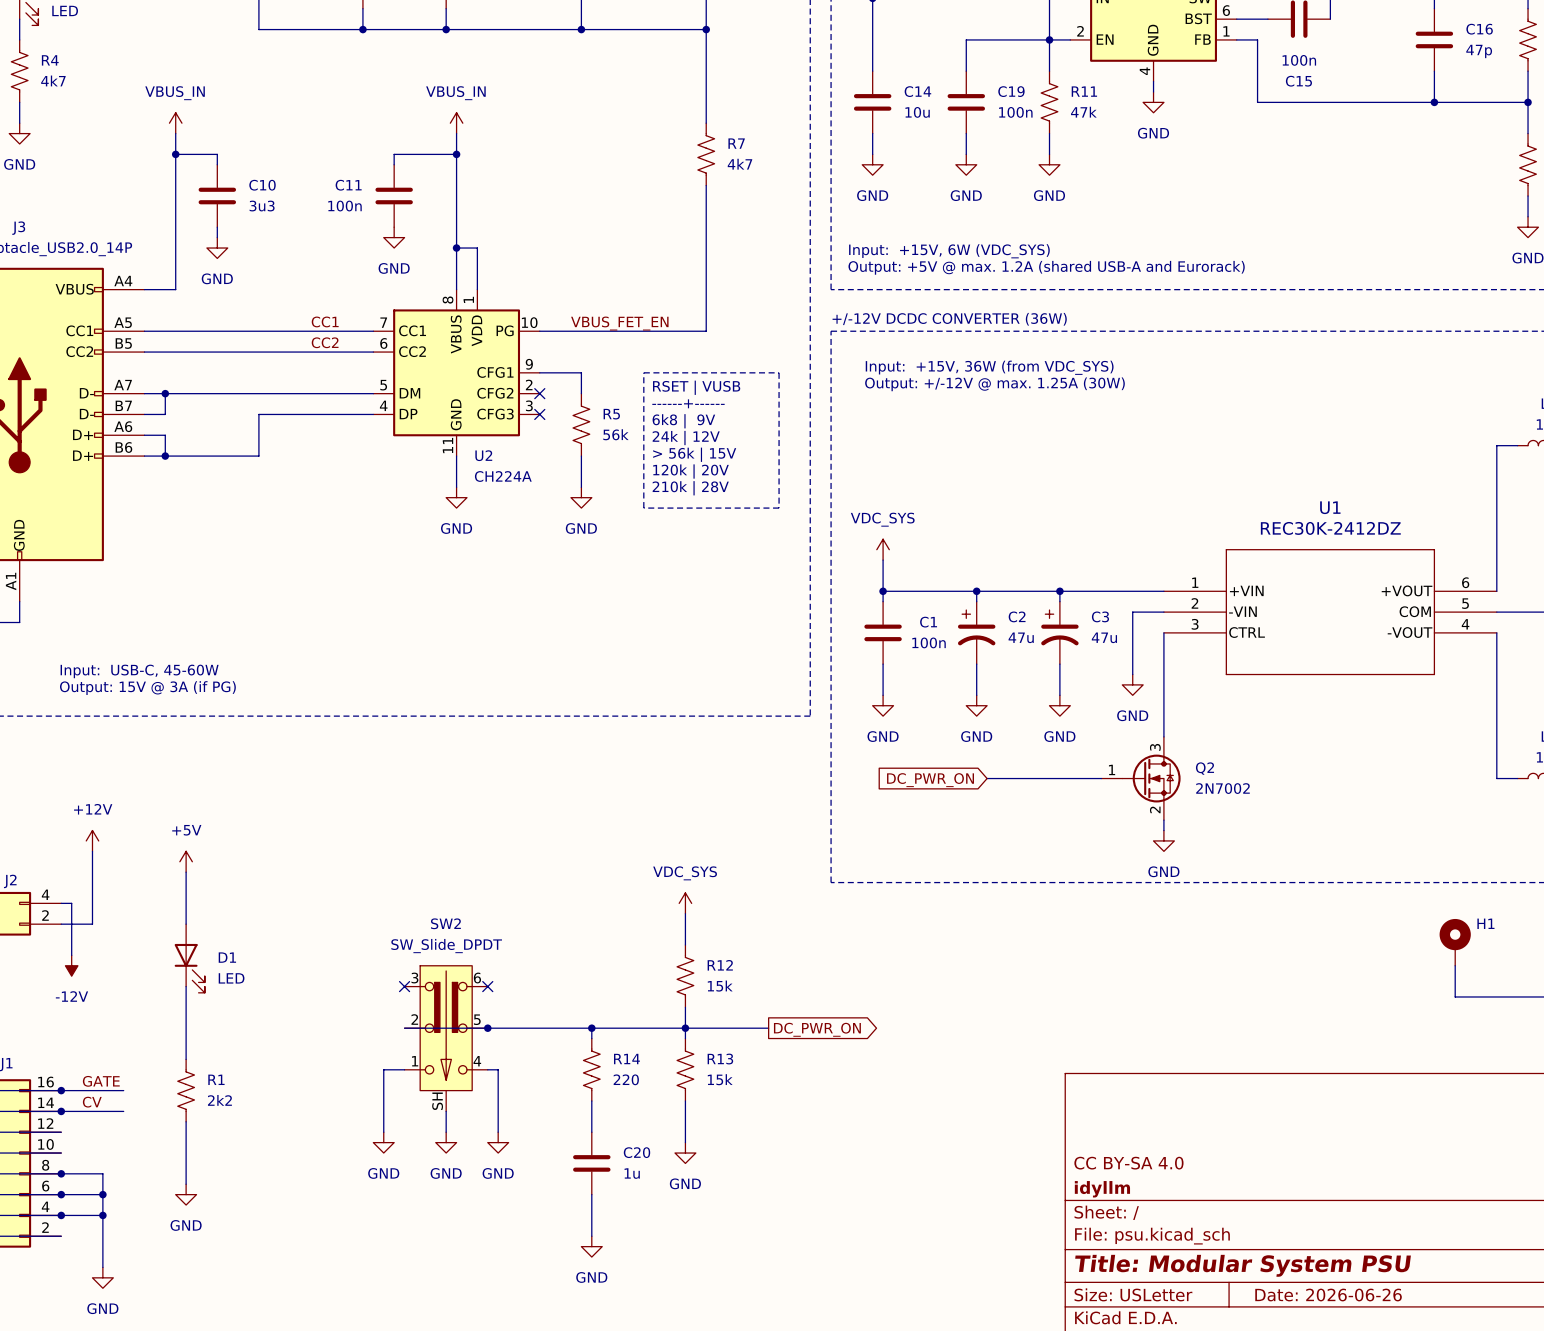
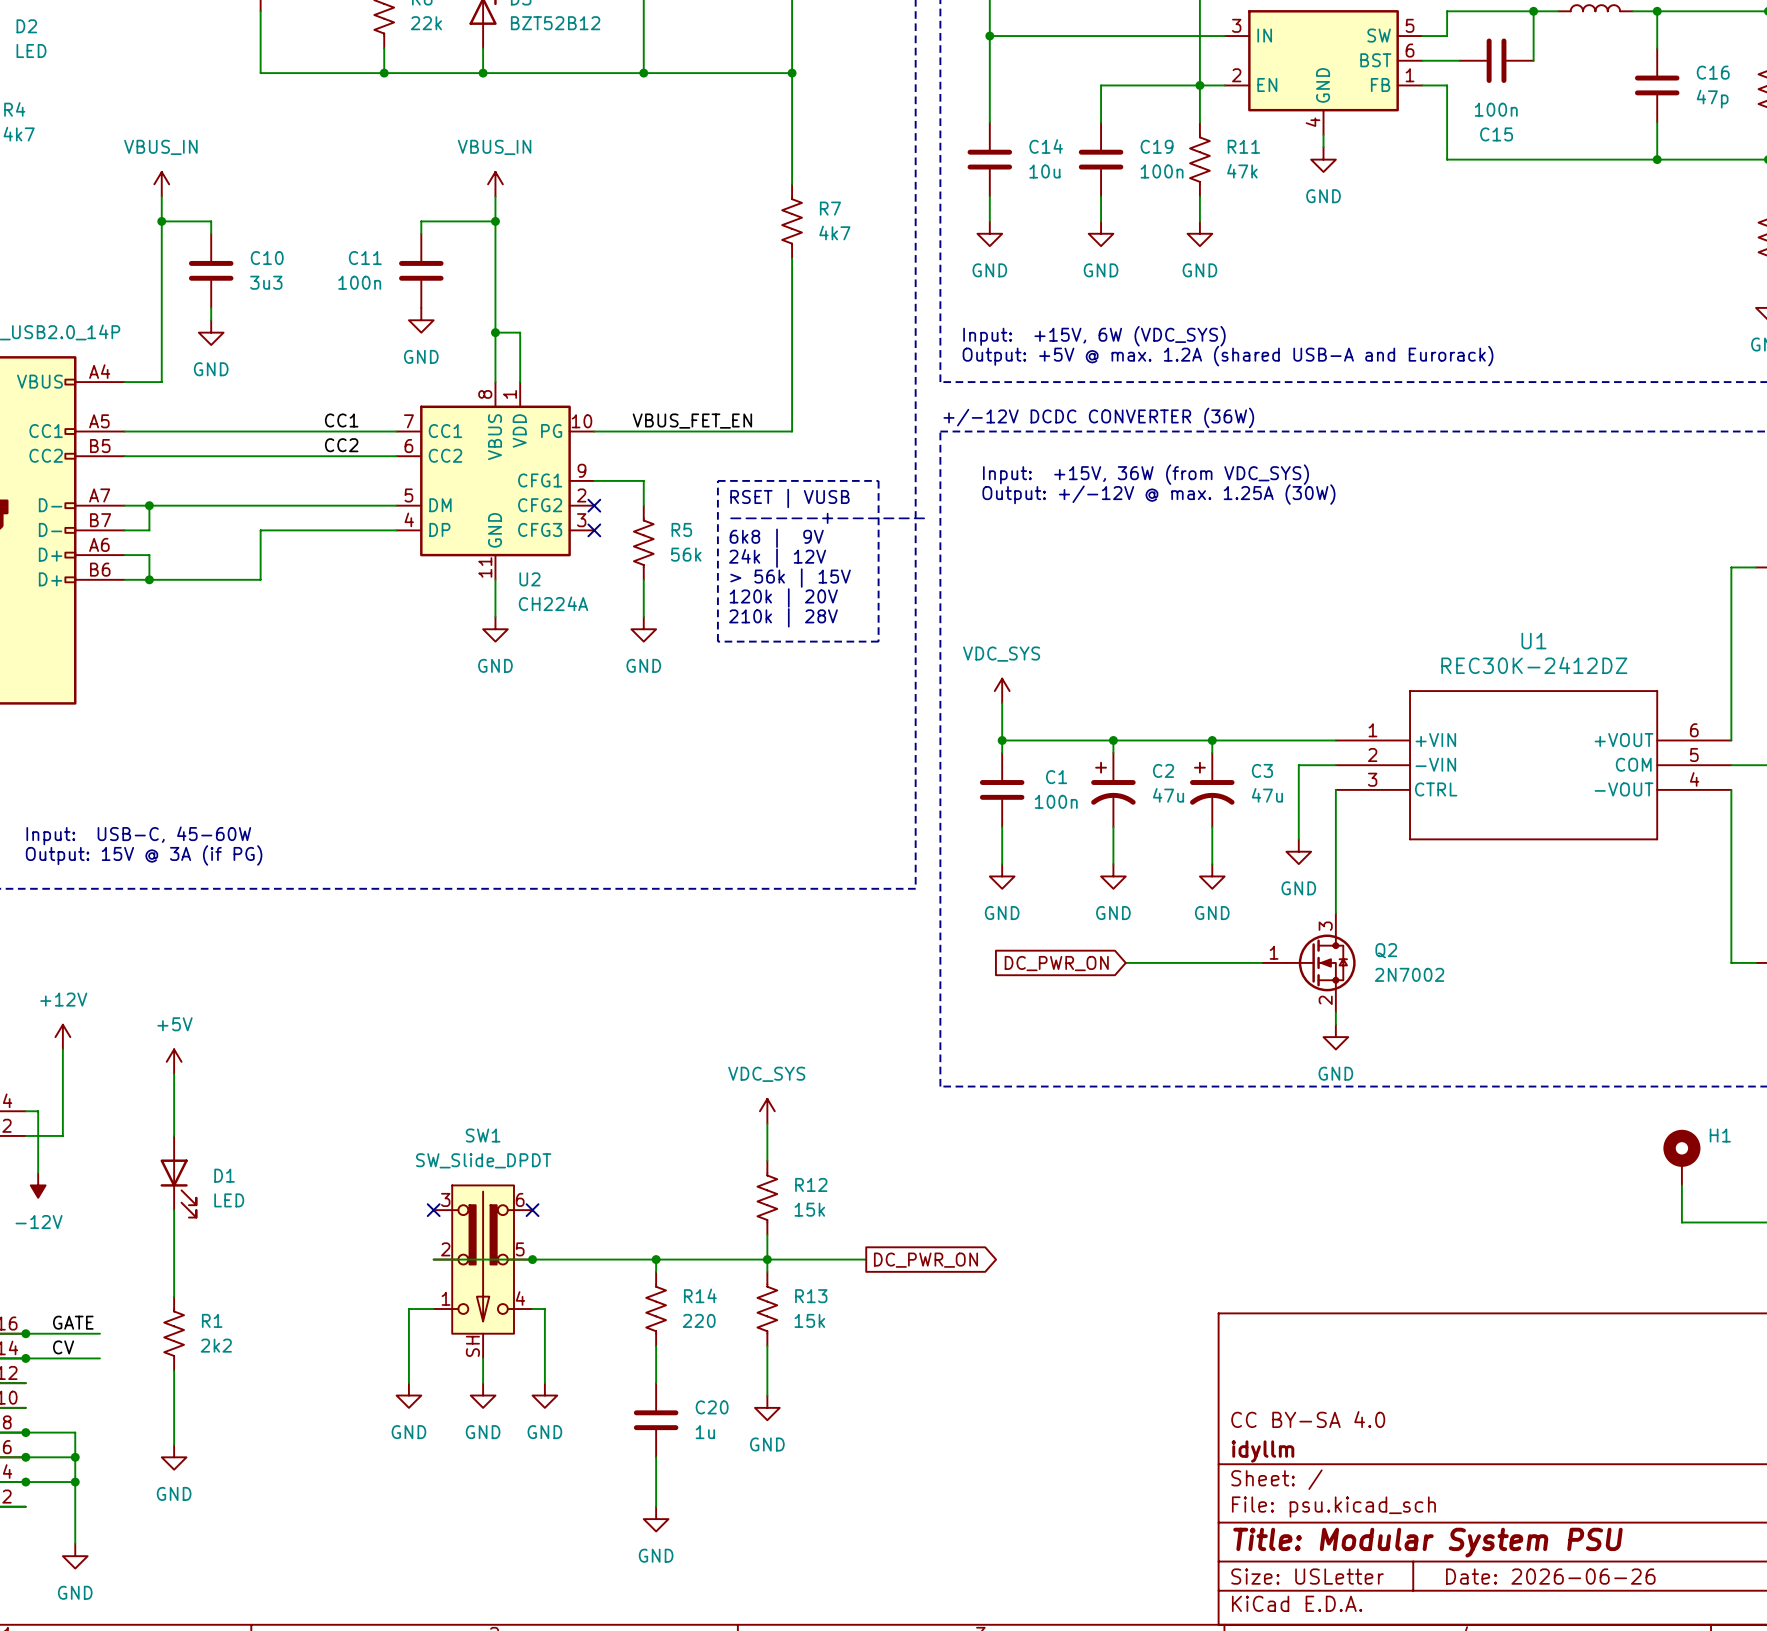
SW2 name: SW2 (445, 923) -> SW1 (483, 1135)

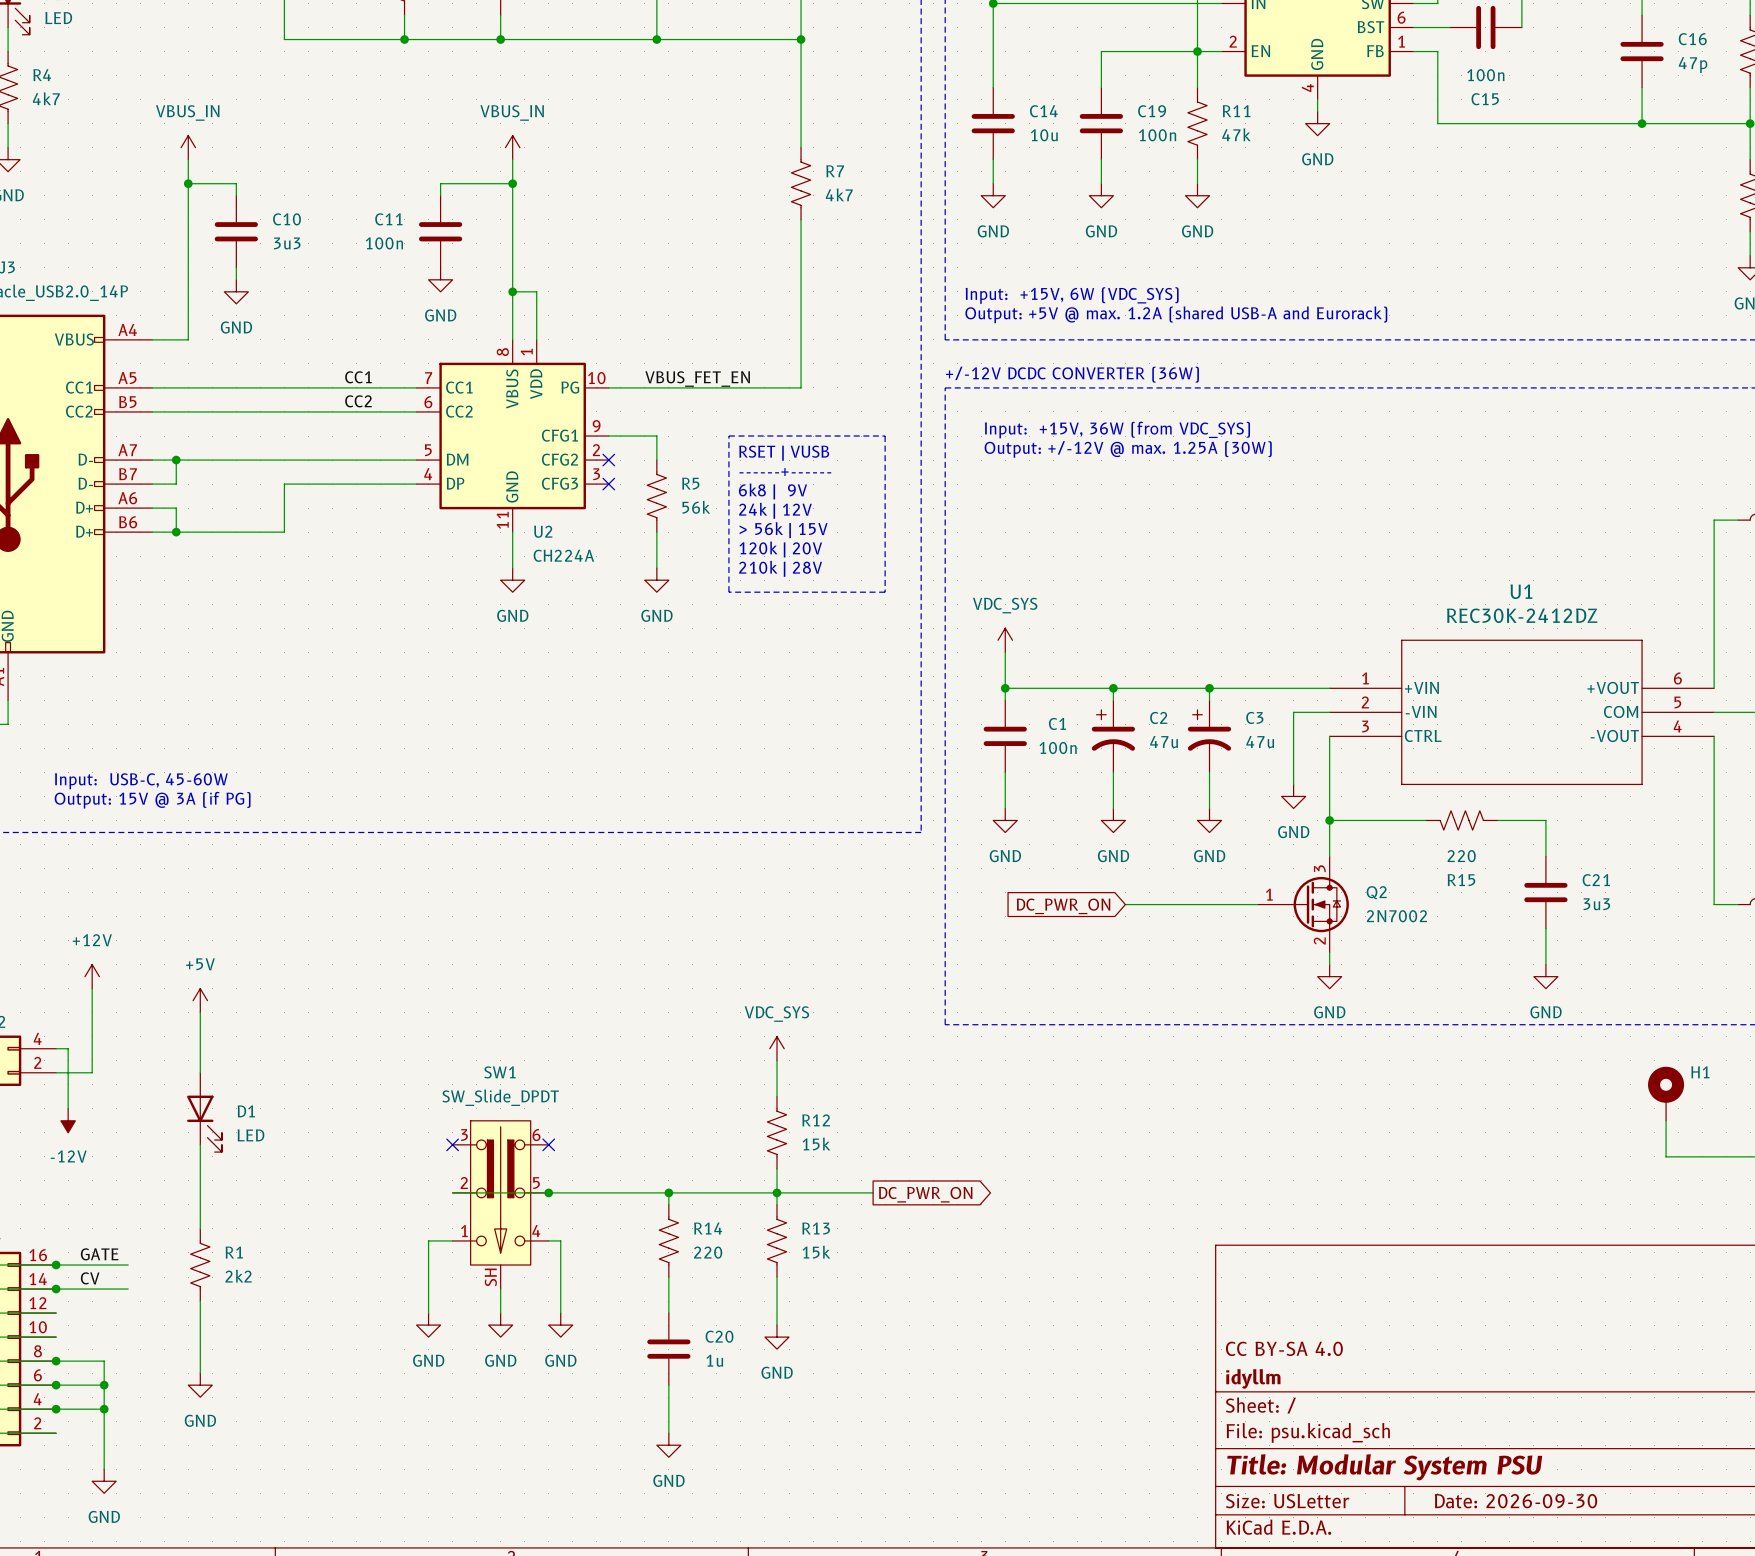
wire: none -> (1329, 820) (1425, 820)
junction: none -> (1329, 820)
R15: none -> 220 (1461, 820)
wire: none -> (1497, 820) (1545, 820) (1545, 856)
C21: none -> 3u3 (1545, 892)
wire: none -> (1545, 928) (1545, 964)
power symbol: none -> GND (1545, 976)
title block: Date: 2026-06-26 (1550, 1576) -> Date: 2026-09-30 (1516, 1501)

